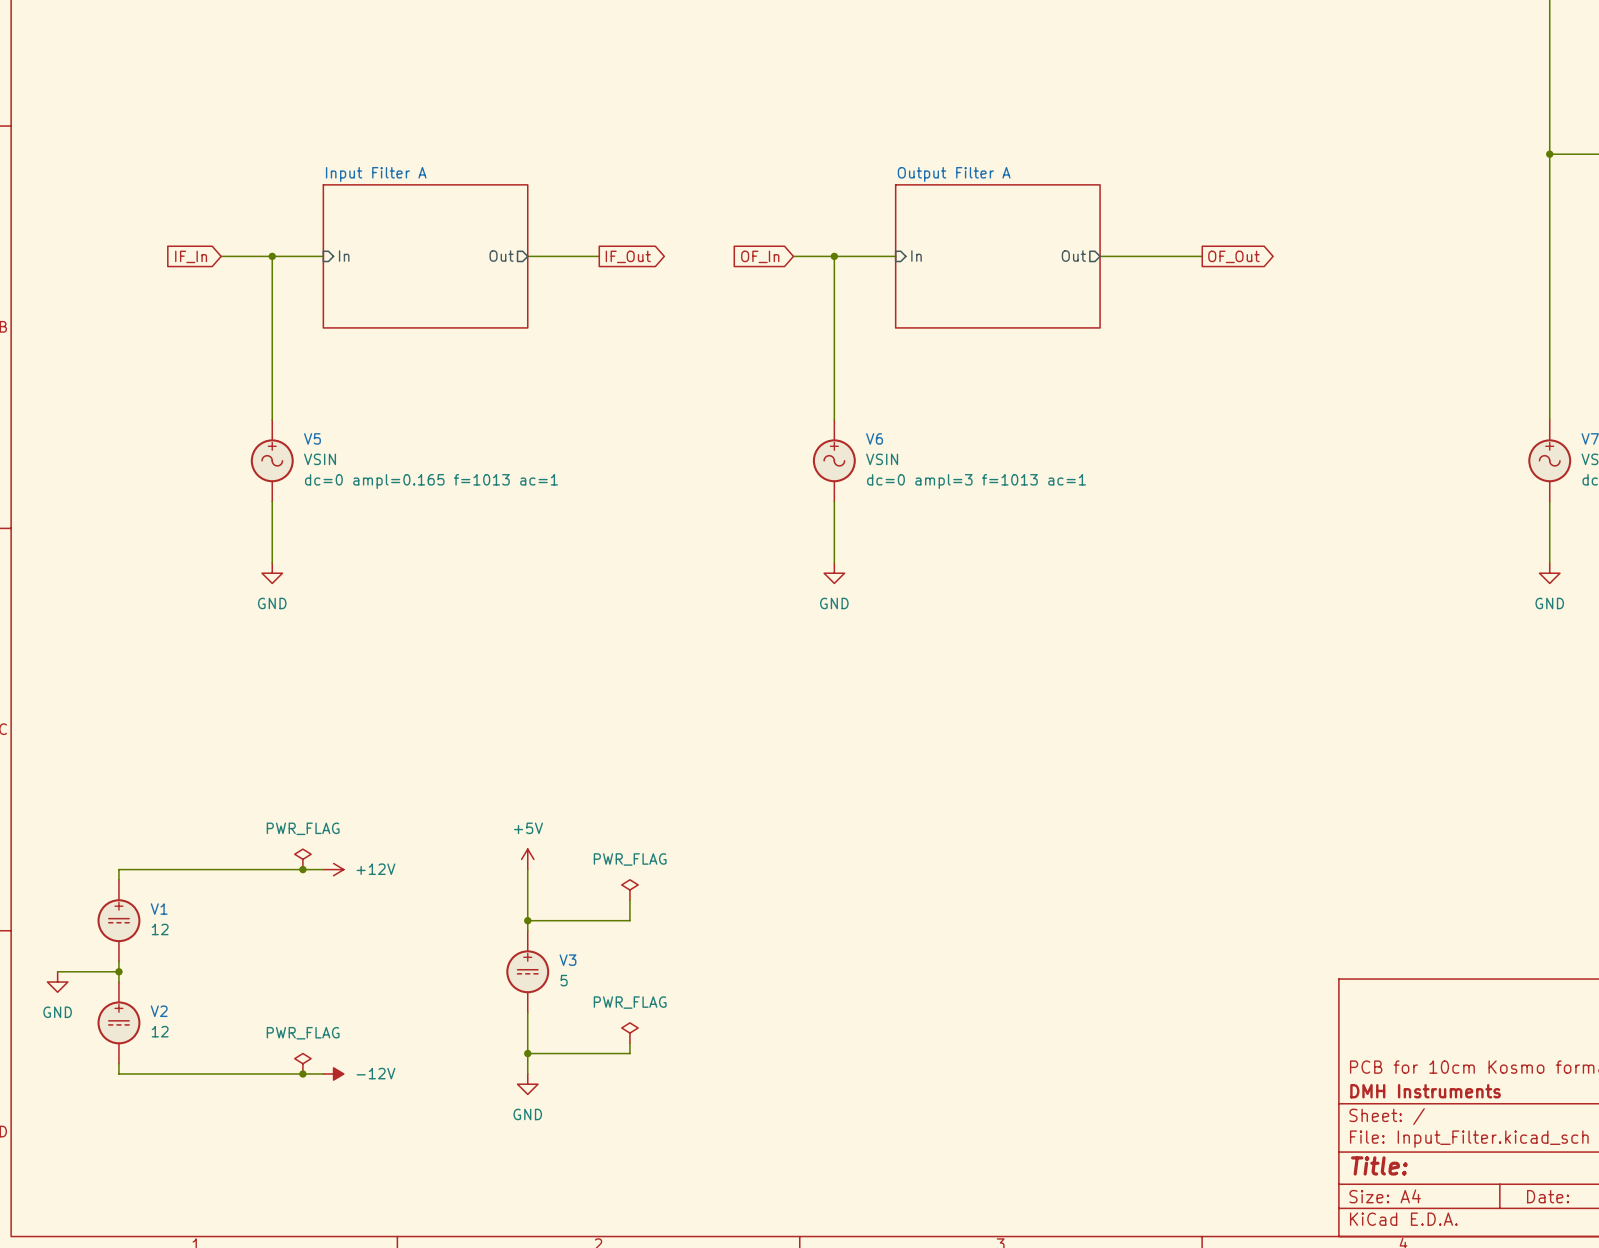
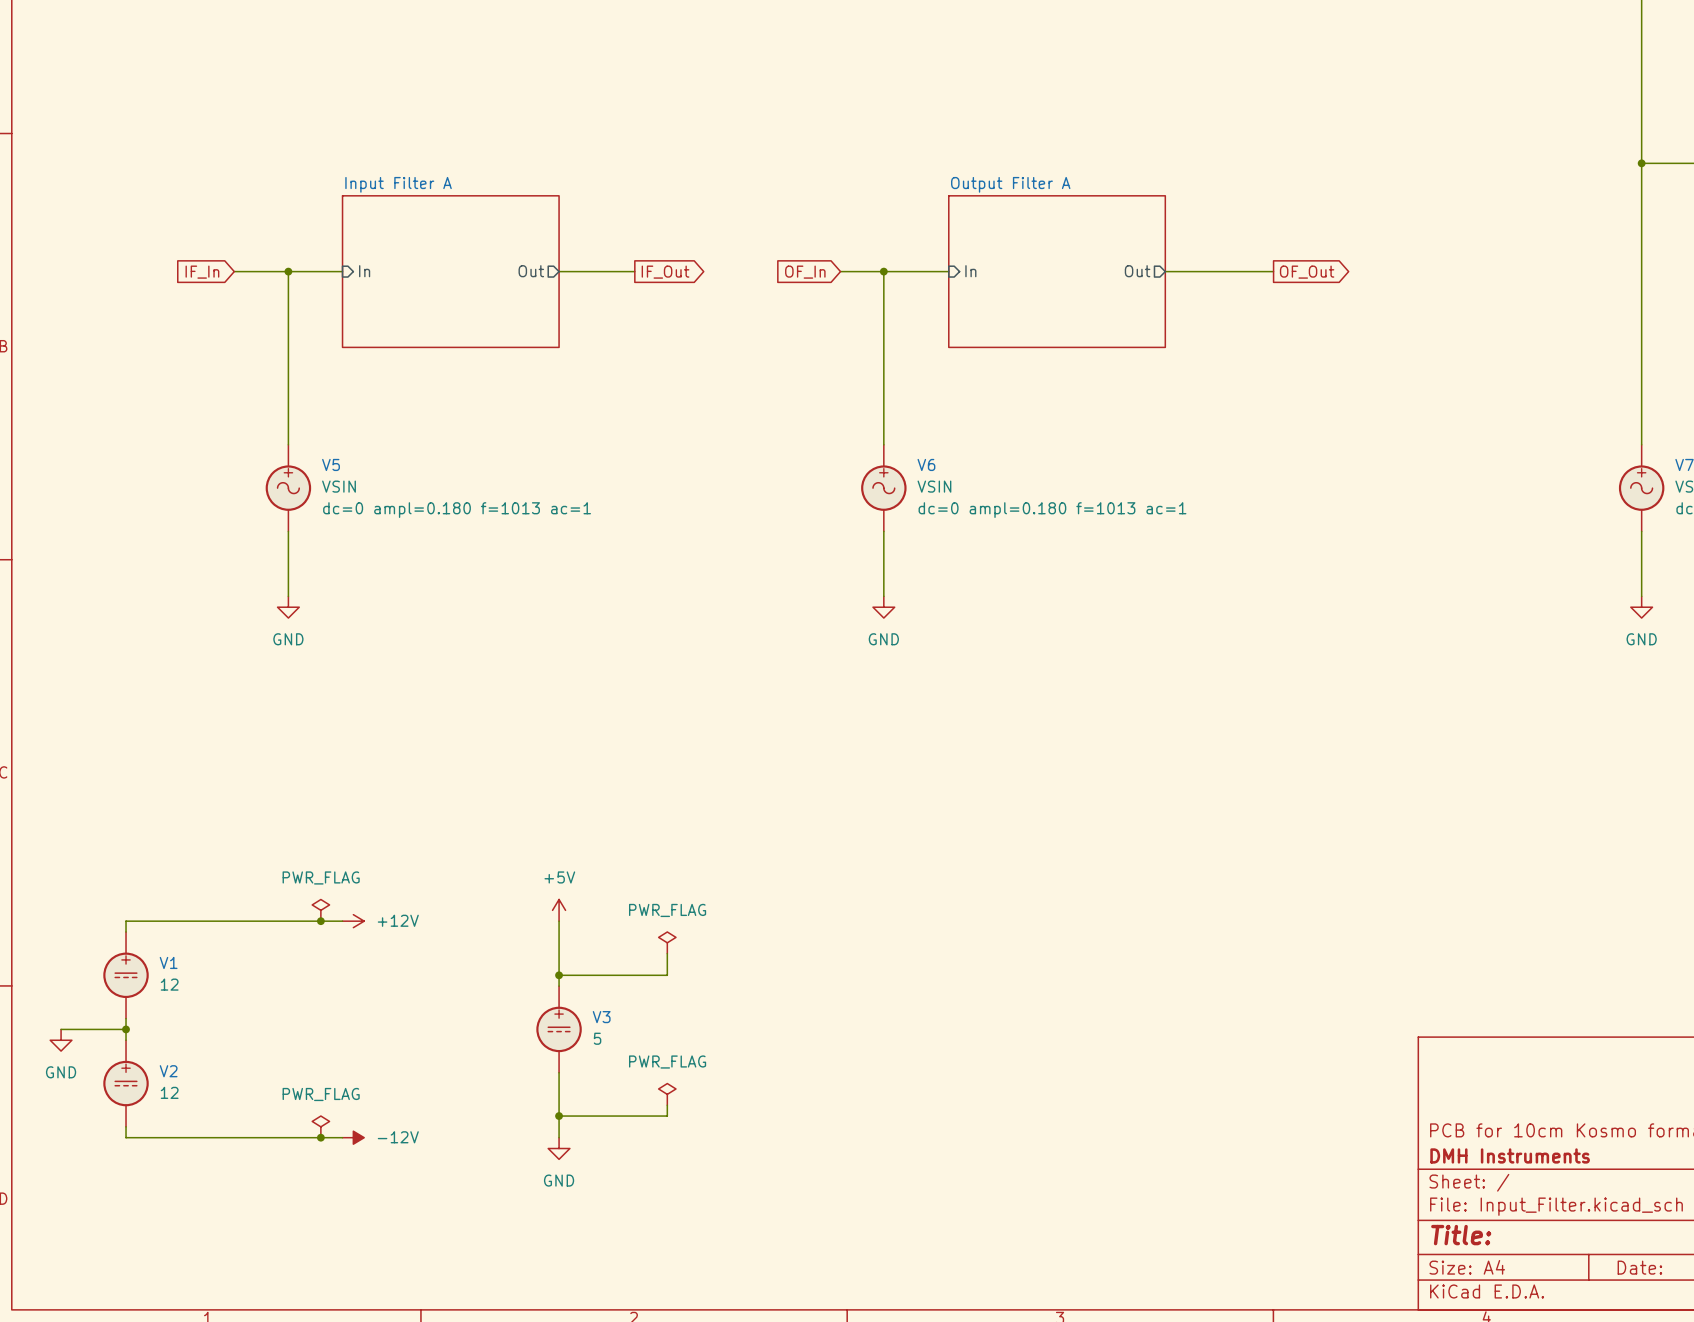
V5 text: dc=0 ampl=0.165 f=1013 ac=1 (431, 481) -> dc=0 ampl=0.180 f=1013 ac=1 (457, 510)
V6 text: dc=0 ampl=3 f=1013 ac=1 (976, 481) -> dc=0 ampl=0.180 f=1013 ac=1 (1052, 510)

